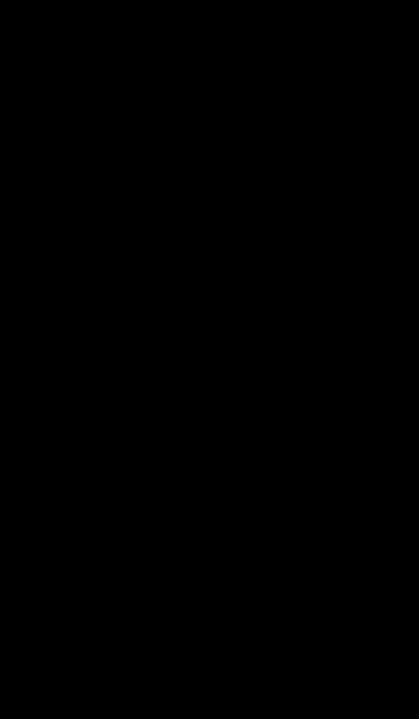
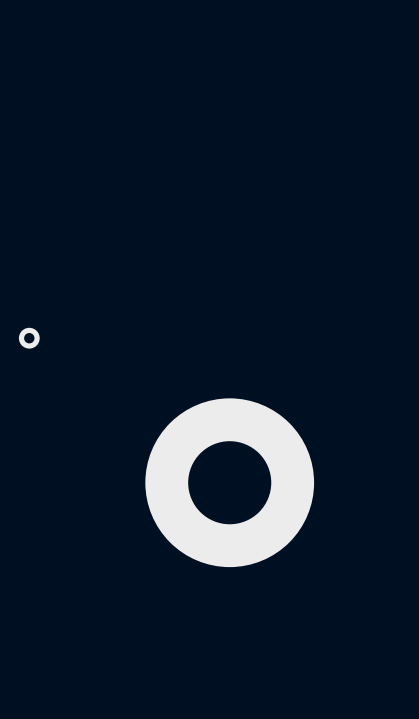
via: none -> (29, 338)
via: none -> (229, 482)

